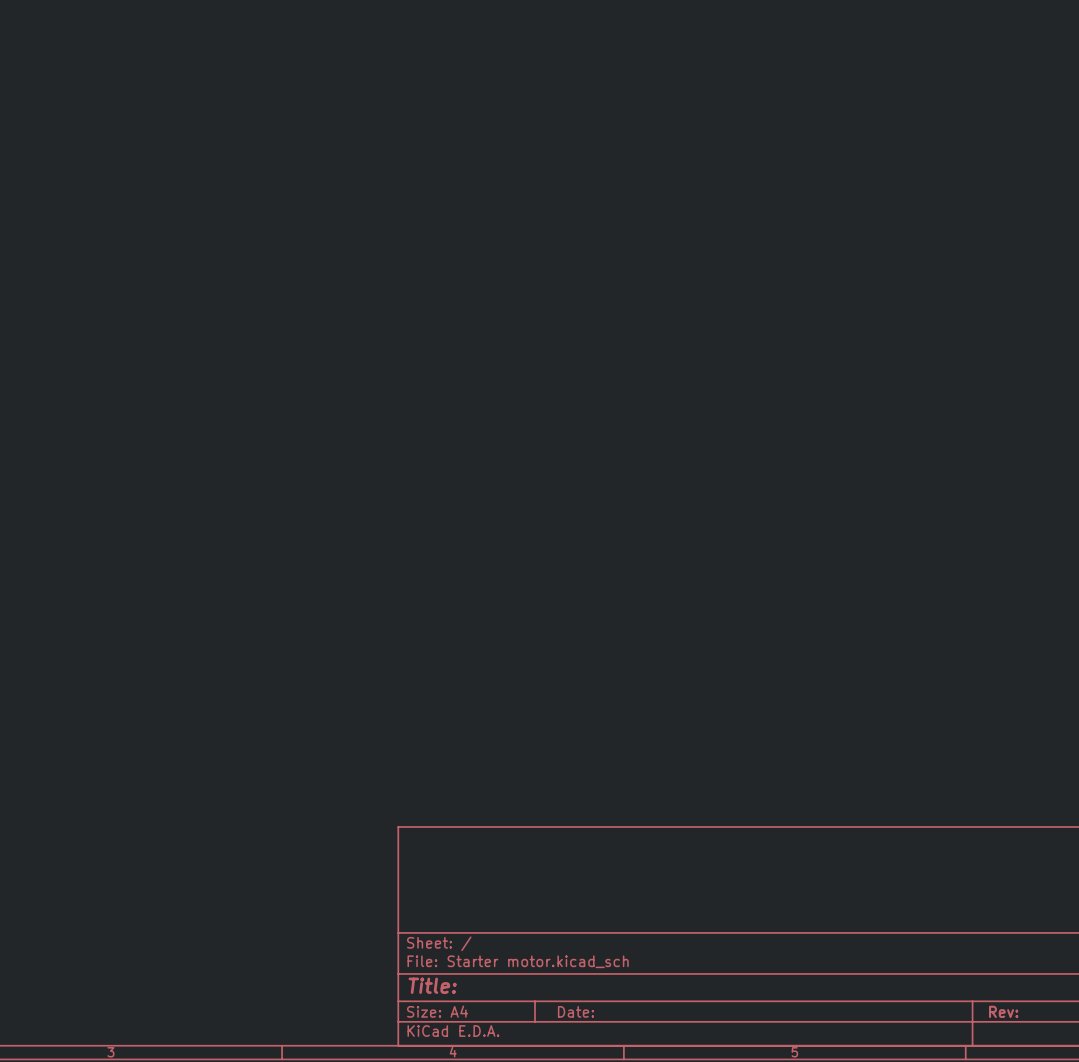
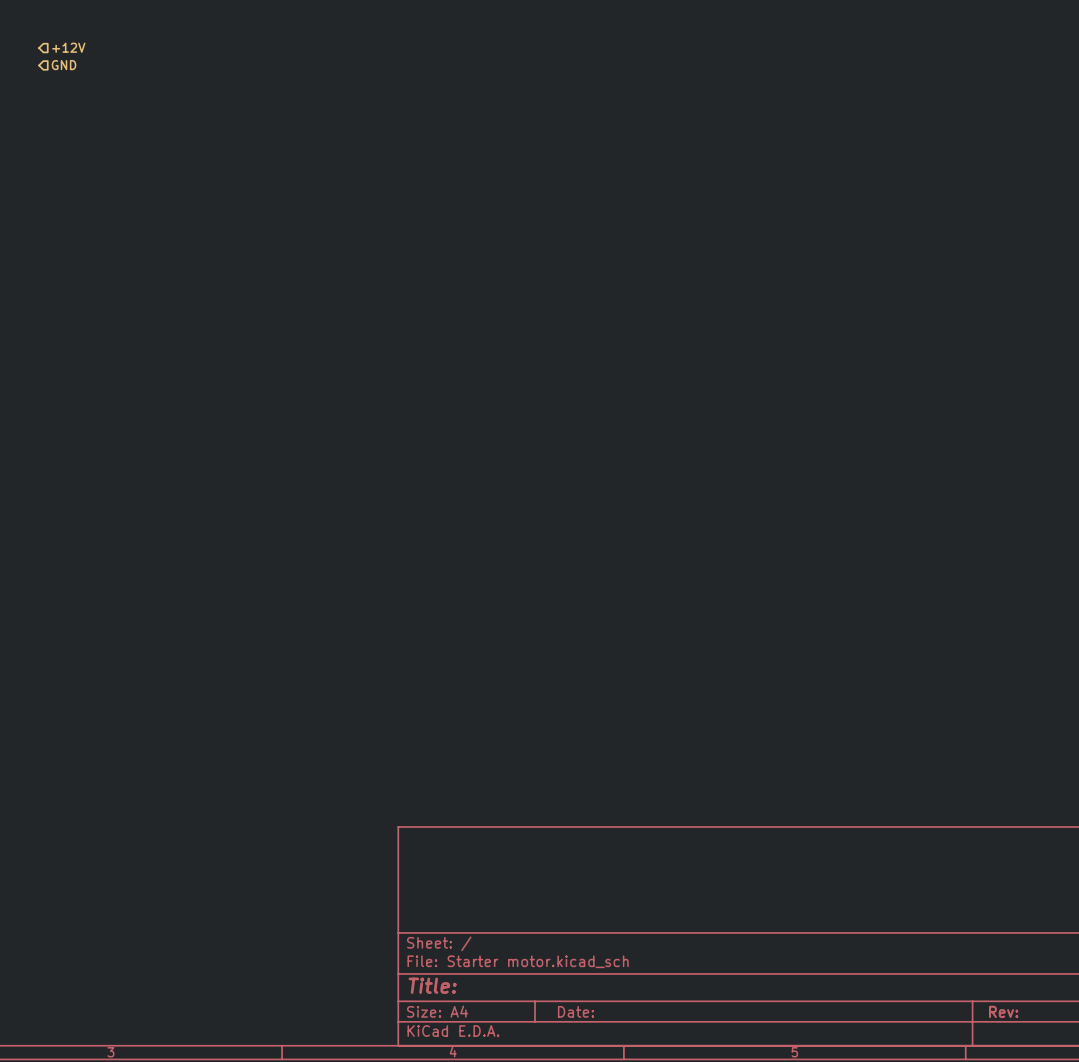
hierarchical label: none -> +12V (68, 47)
hierarchical label: none -> GND (64, 65)

